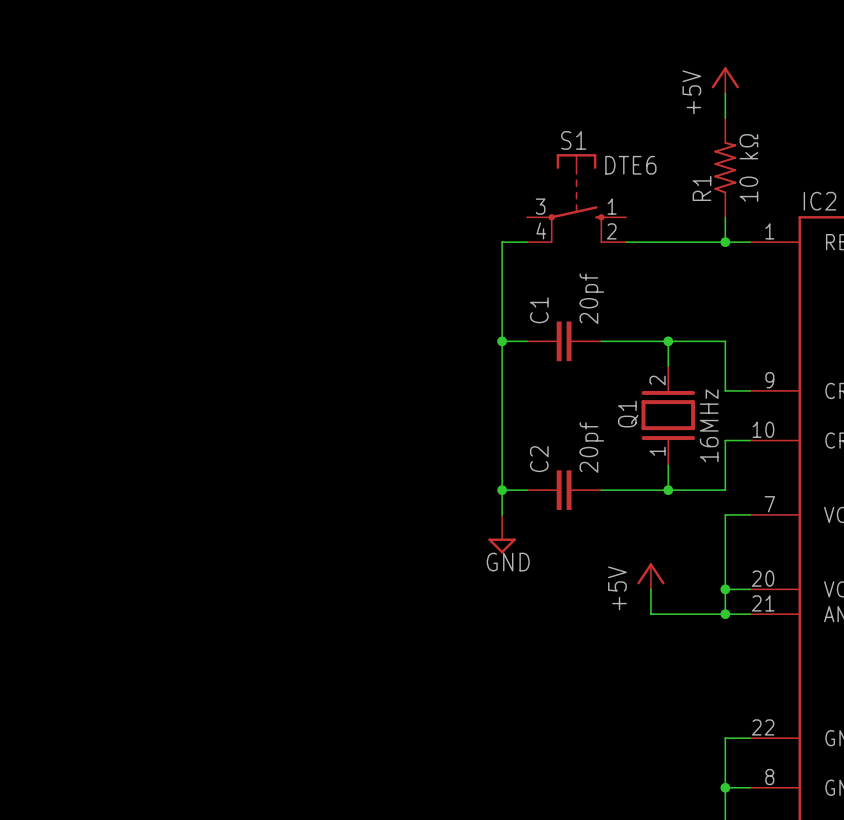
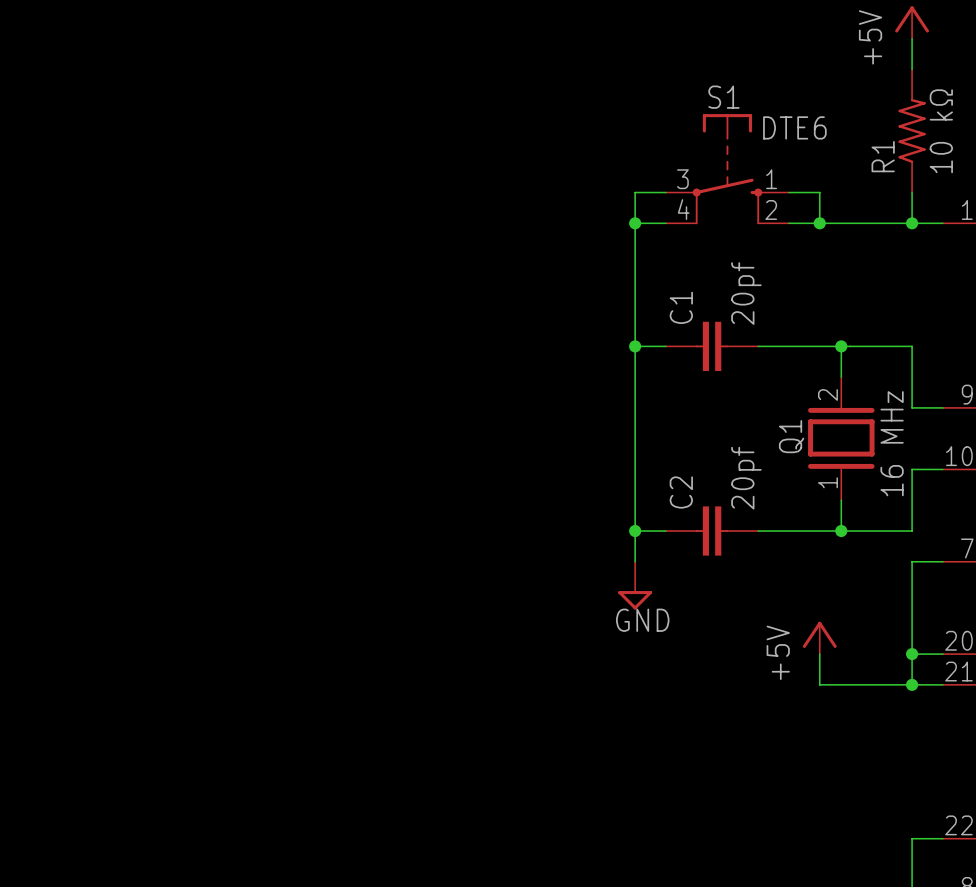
wire: none -> (665, 192) (635, 192) (635, 223)
wire: none -> (788, 192) (819, 192) (819, 223)
junction: none -> (635, 223)
junction: none -> (819, 223)
Q1 value: 16MHz (709, 425) -> 16 MHz (892, 443)

